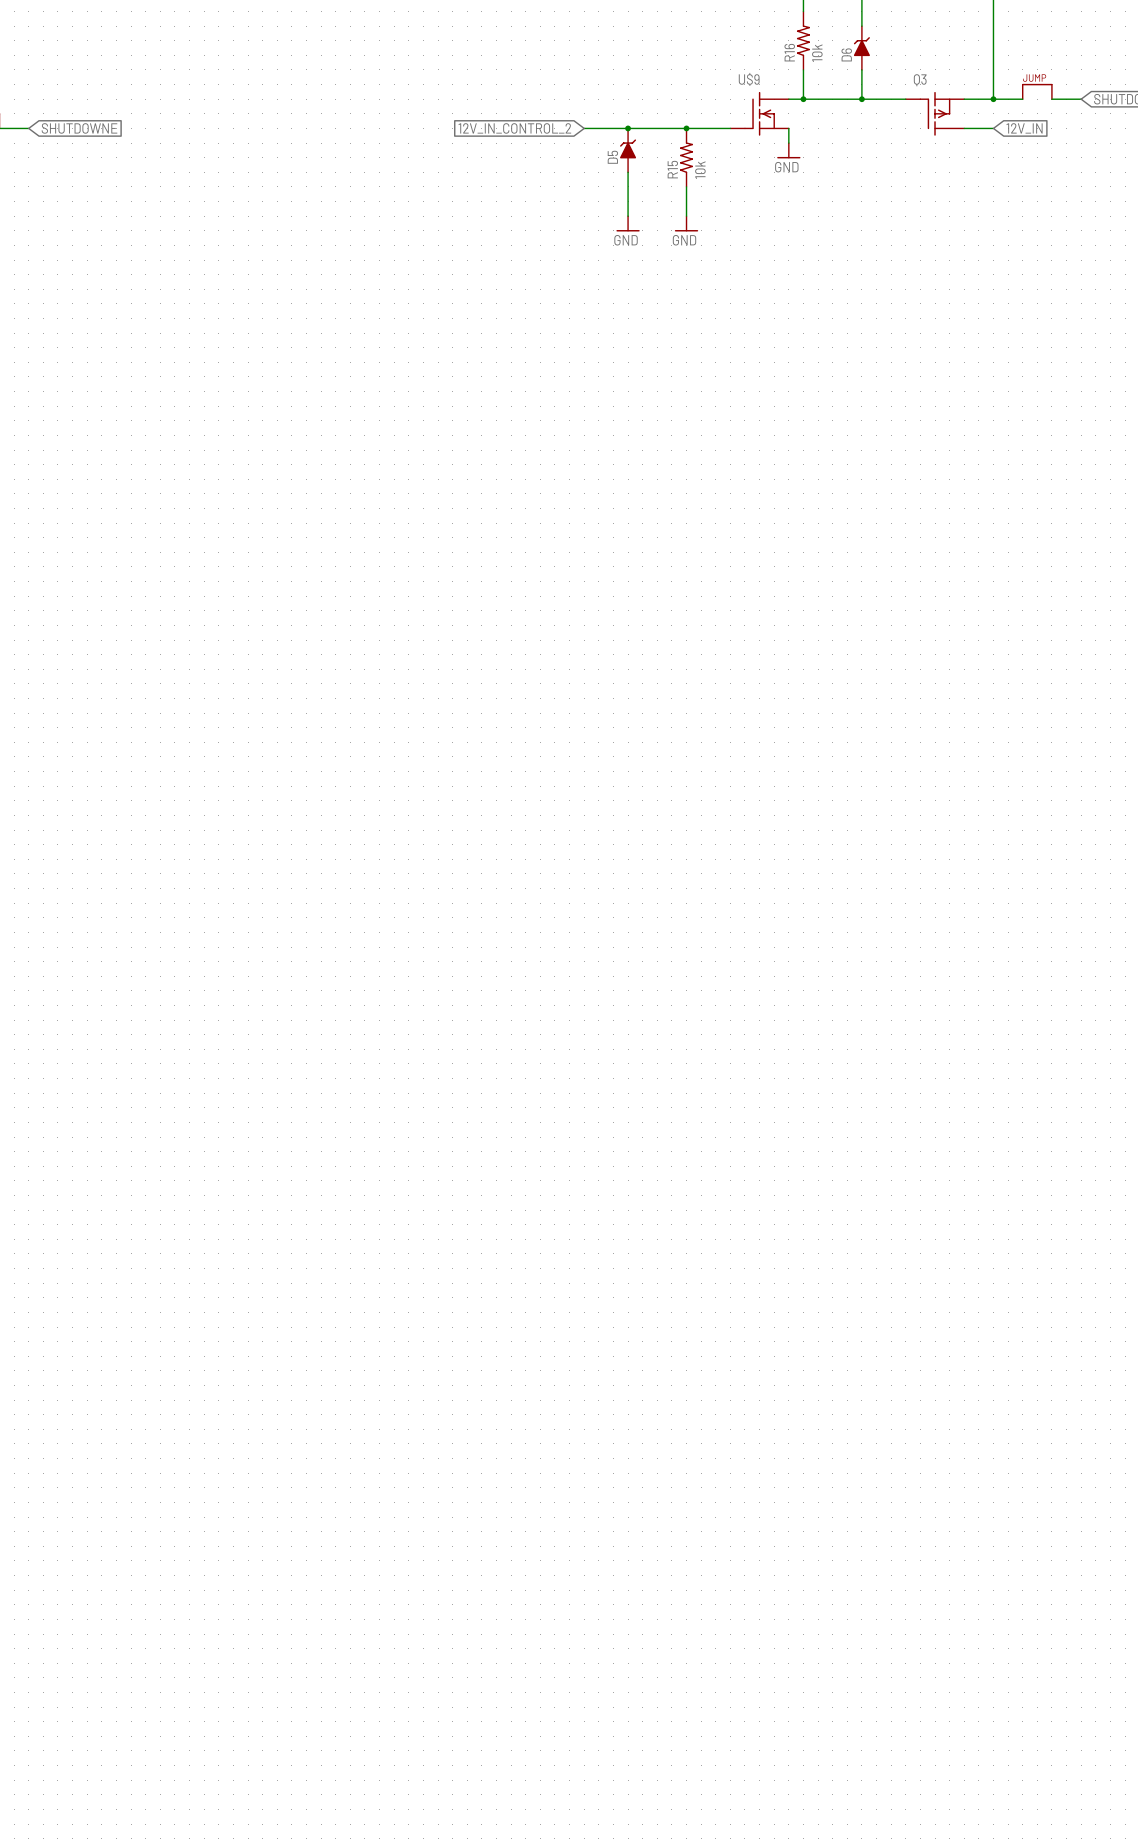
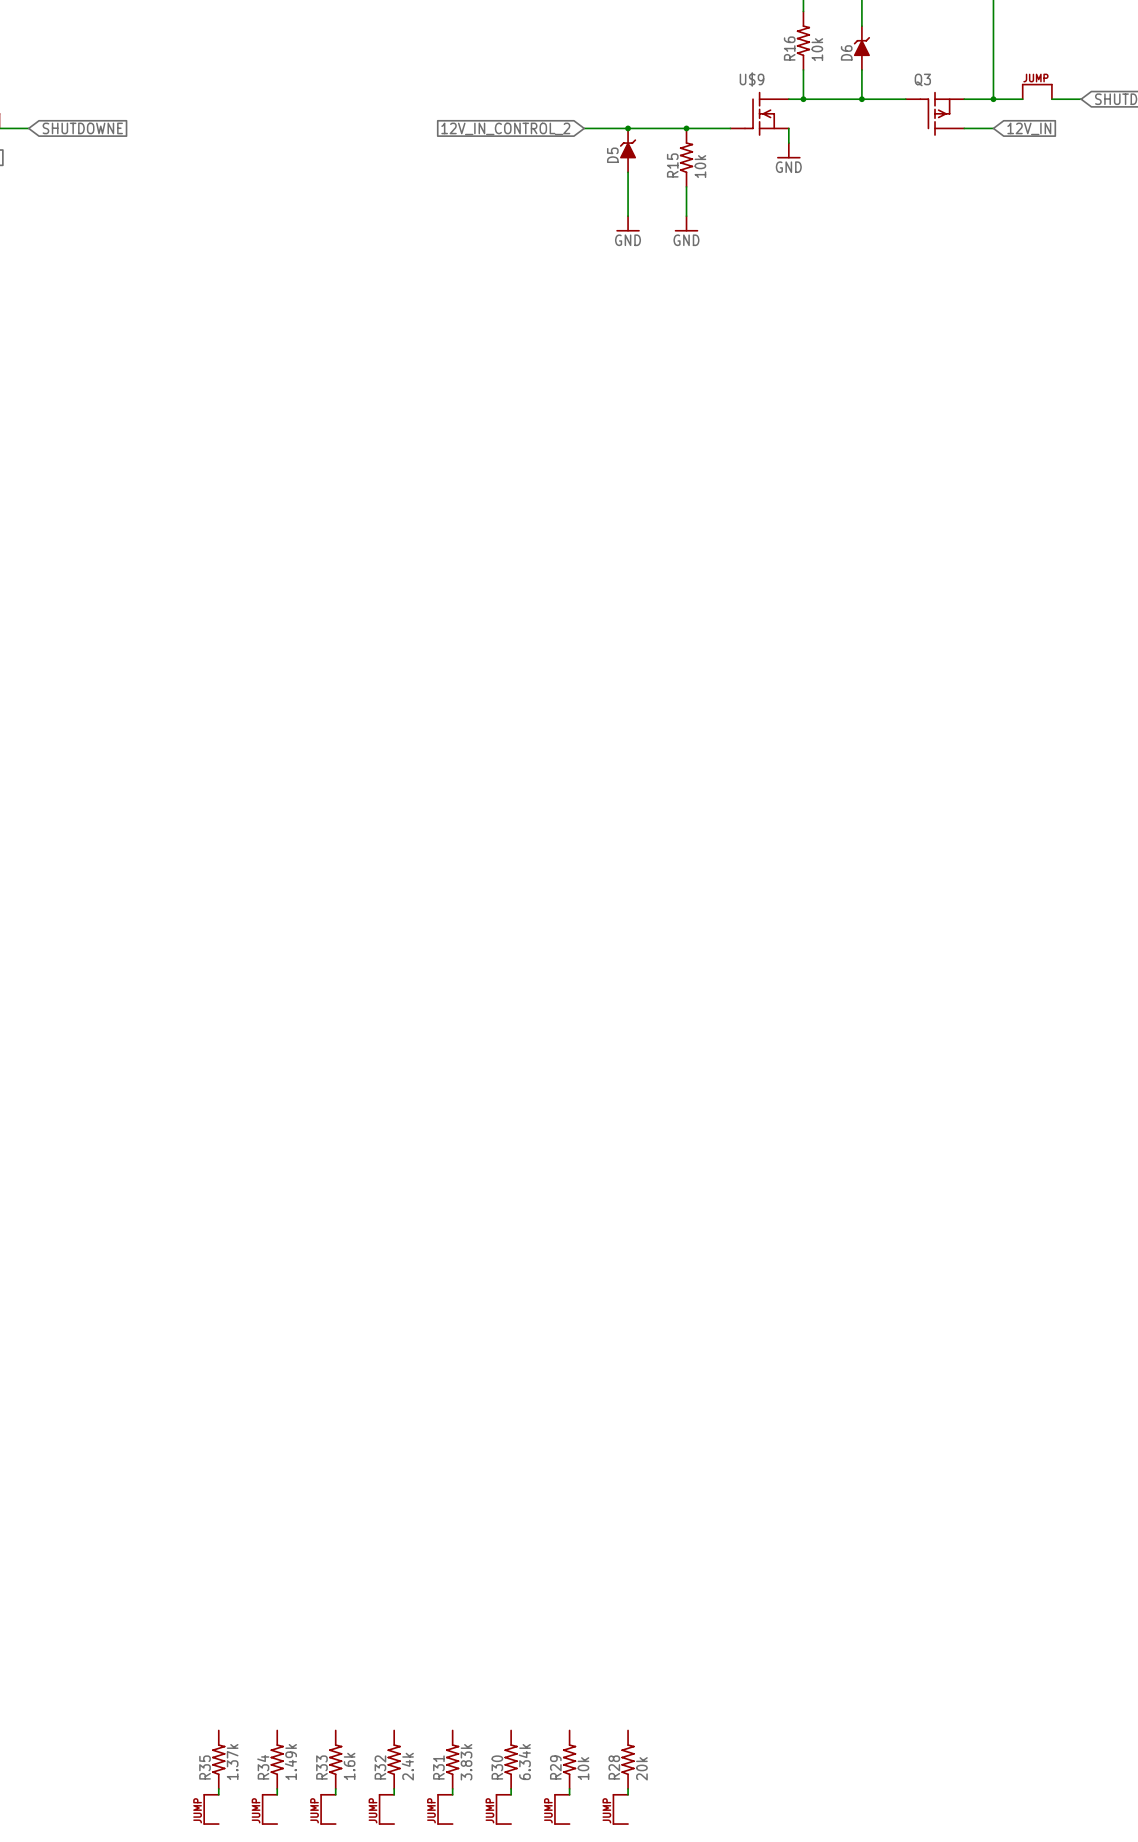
R35: none -> 1.37k (218, 1759)
R34: none -> 1.49k (277, 1759)
R33: none -> 1.6k (335, 1759)
R32: none -> 2.4k (394, 1759)
R31: none -> 3.83k (452, 1759)
R30: none -> 6.34k (511, 1759)
R29: none -> 10k (569, 1759)
R28: none -> 20k (628, 1759)
wire: none -> (218, 1788) (218, 1794)
wire: none -> (277, 1788) (277, 1794)
wire: none -> (335, 1788) (335, 1794)
wire: none -> (394, 1788) (394, 1794)
wire: none -> (452, 1788) (452, 1794)
wire: none -> (511, 1788) (511, 1794)
wire: none -> (569, 1788) (569, 1794)
wire: none -> (628, 1788) (628, 1794)
part: none -> (211, 1809)
part: none -> (269, 1809)
part: none -> (328, 1809)
part: none -> (386, 1809)
part: none -> (444, 1809)
part: none -> (503, 1809)
part: none -> (561, 1809)
part: none -> (620, 1809)

